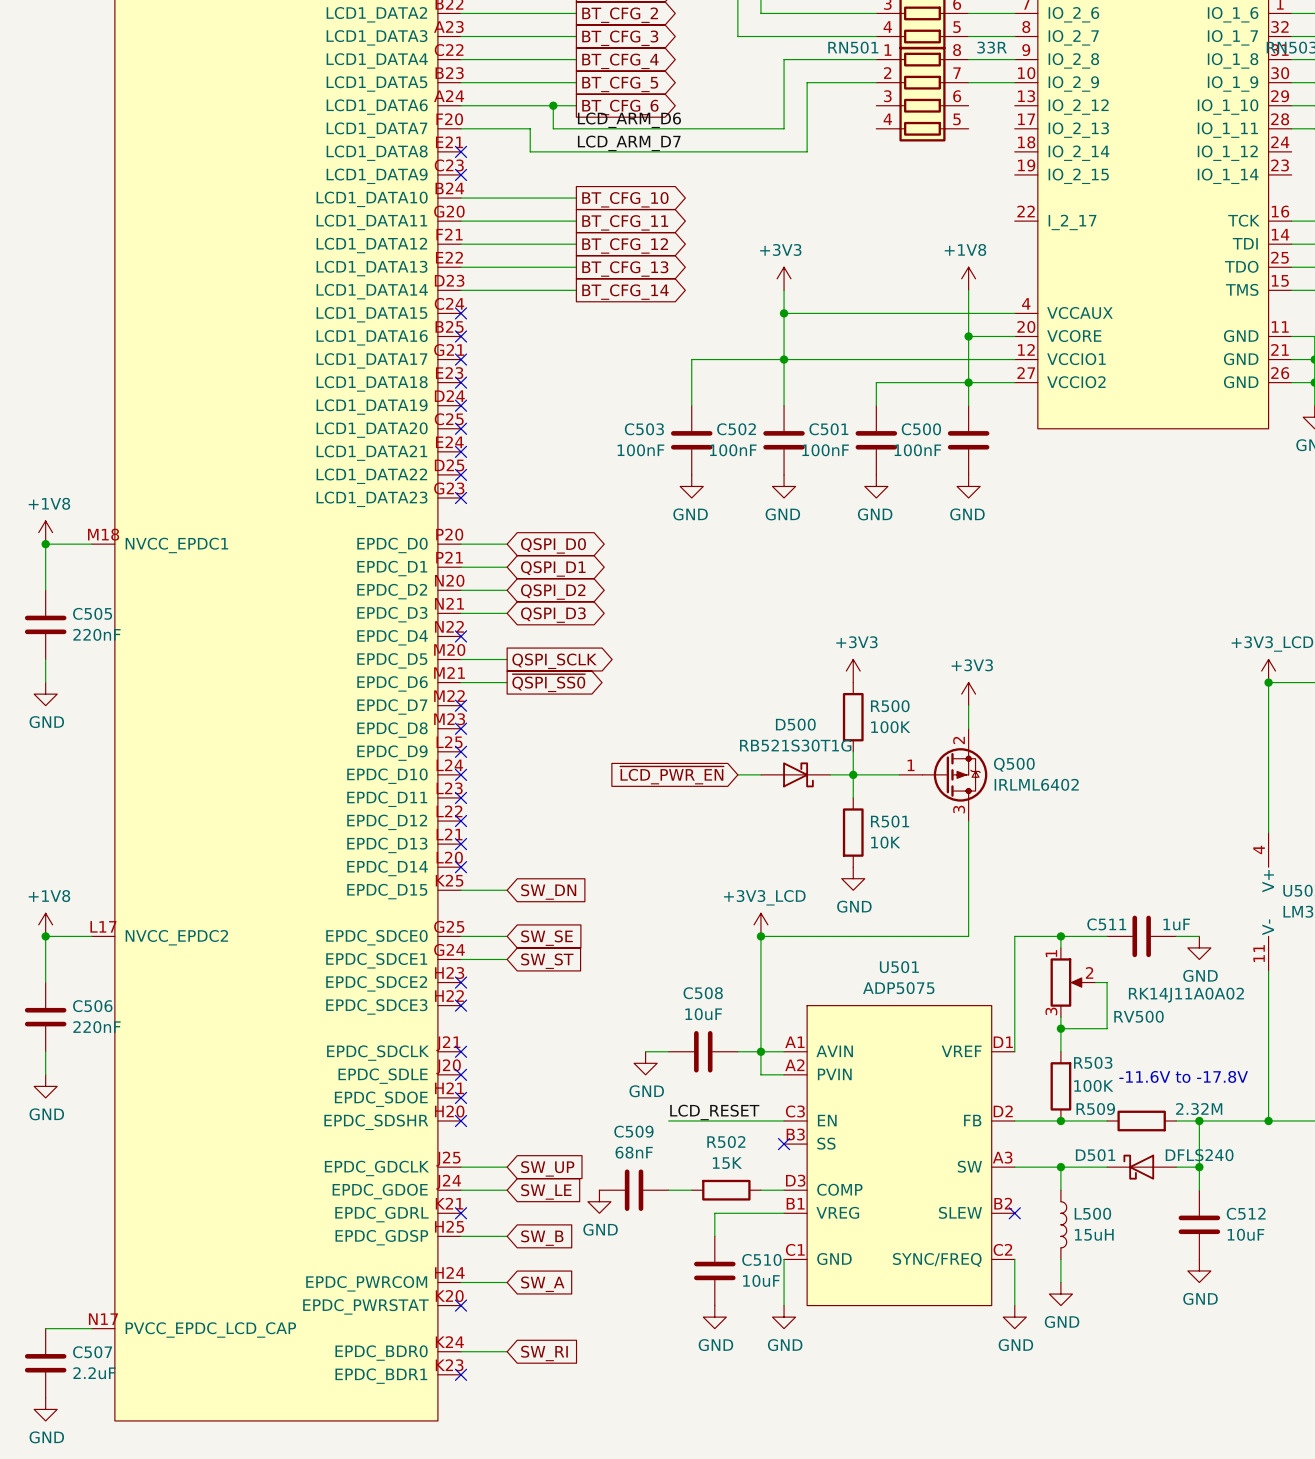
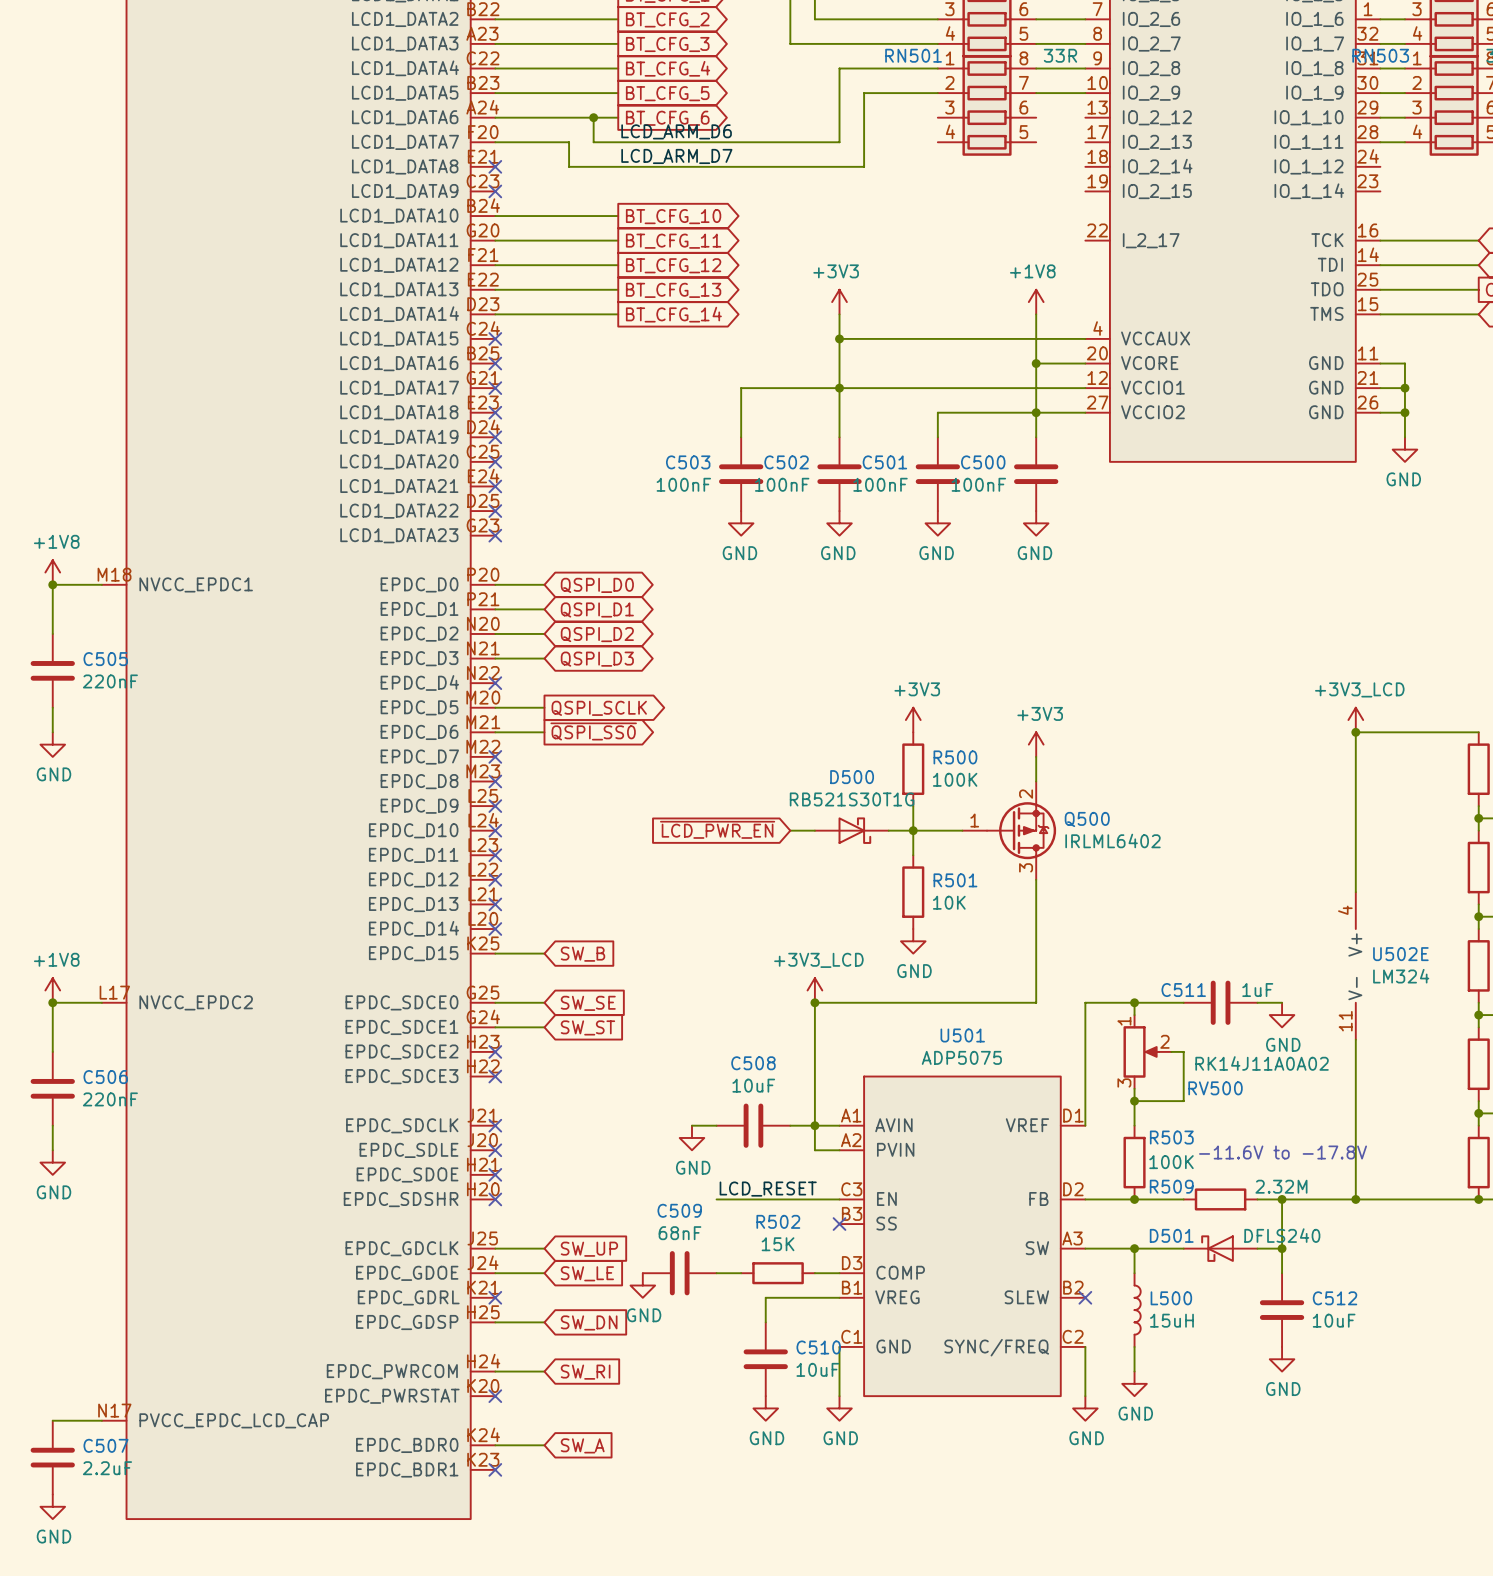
global label: SW_DN (548, 892) -> SW_B (582, 954)
global label: SW_B (542, 1238) -> SW_DN (589, 1322)
global label: SW_A (542, 1284) -> SW_RI (585, 1372)
global label: SW_RI (544, 1353) -> SW_A (582, 1445)

